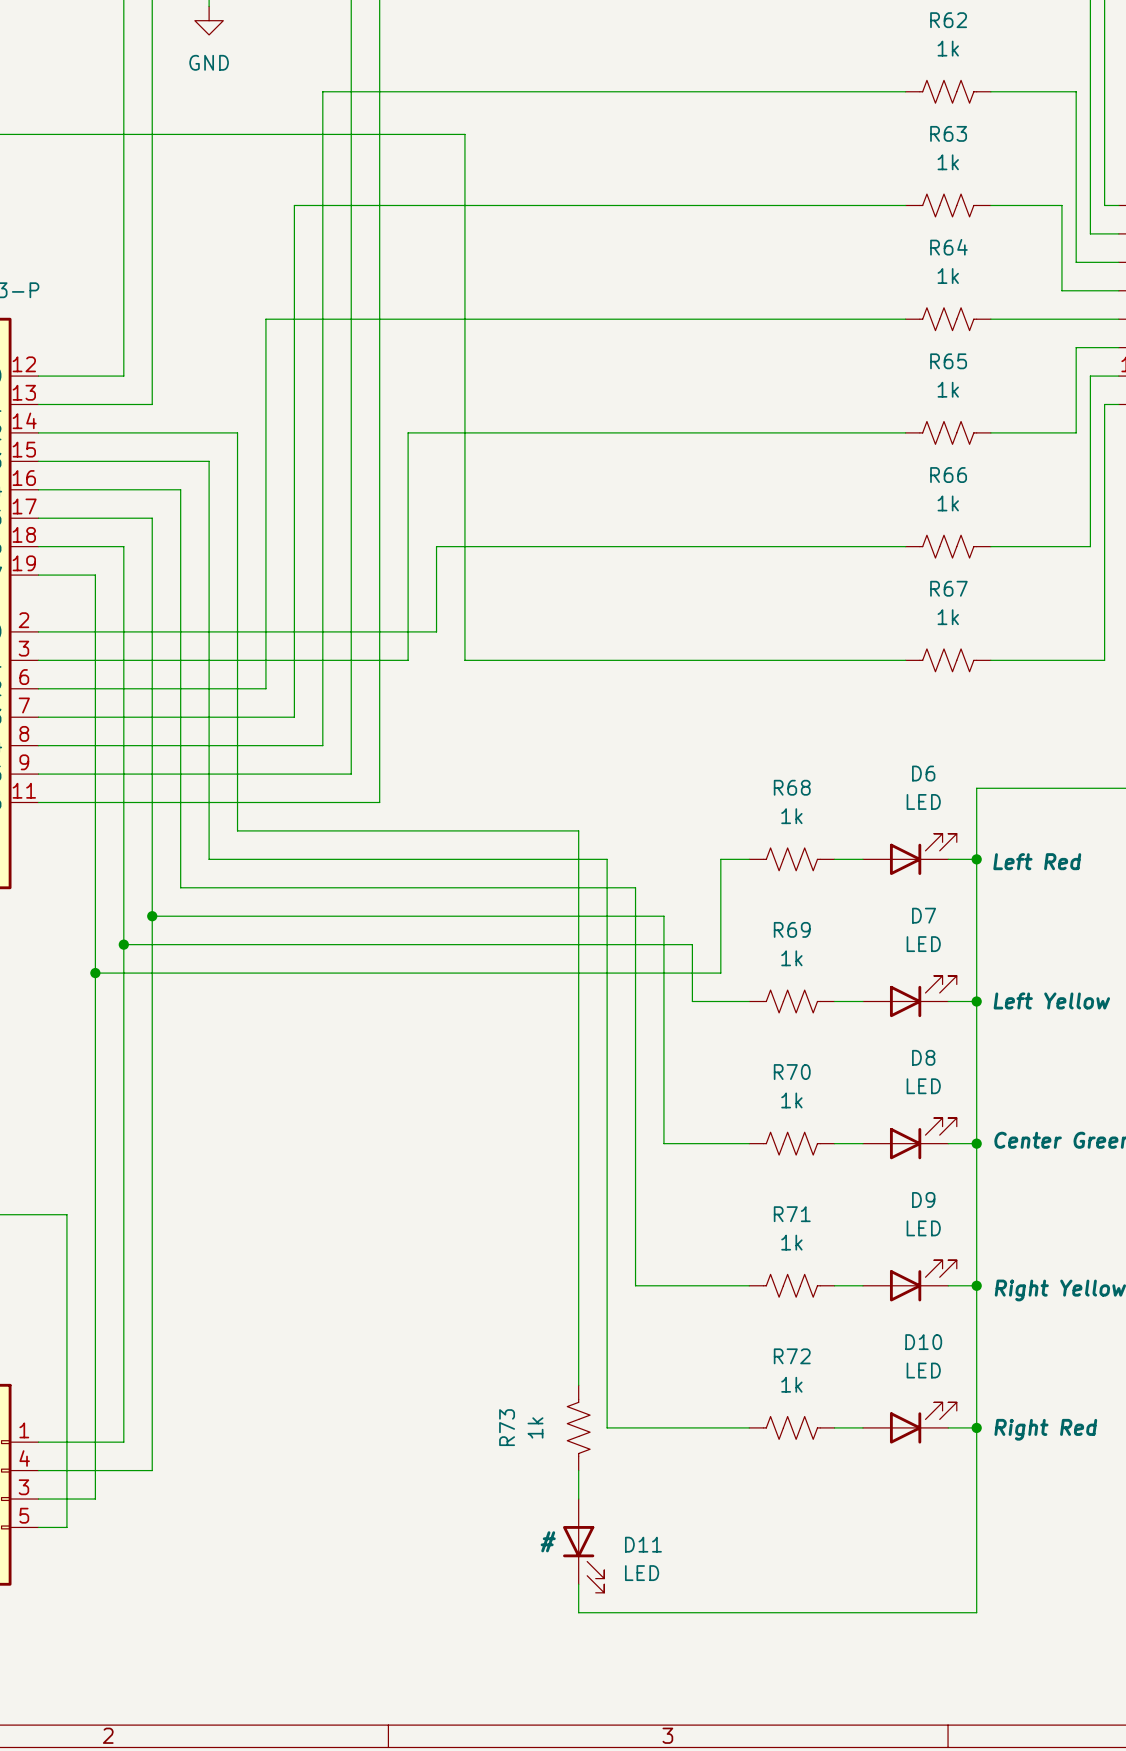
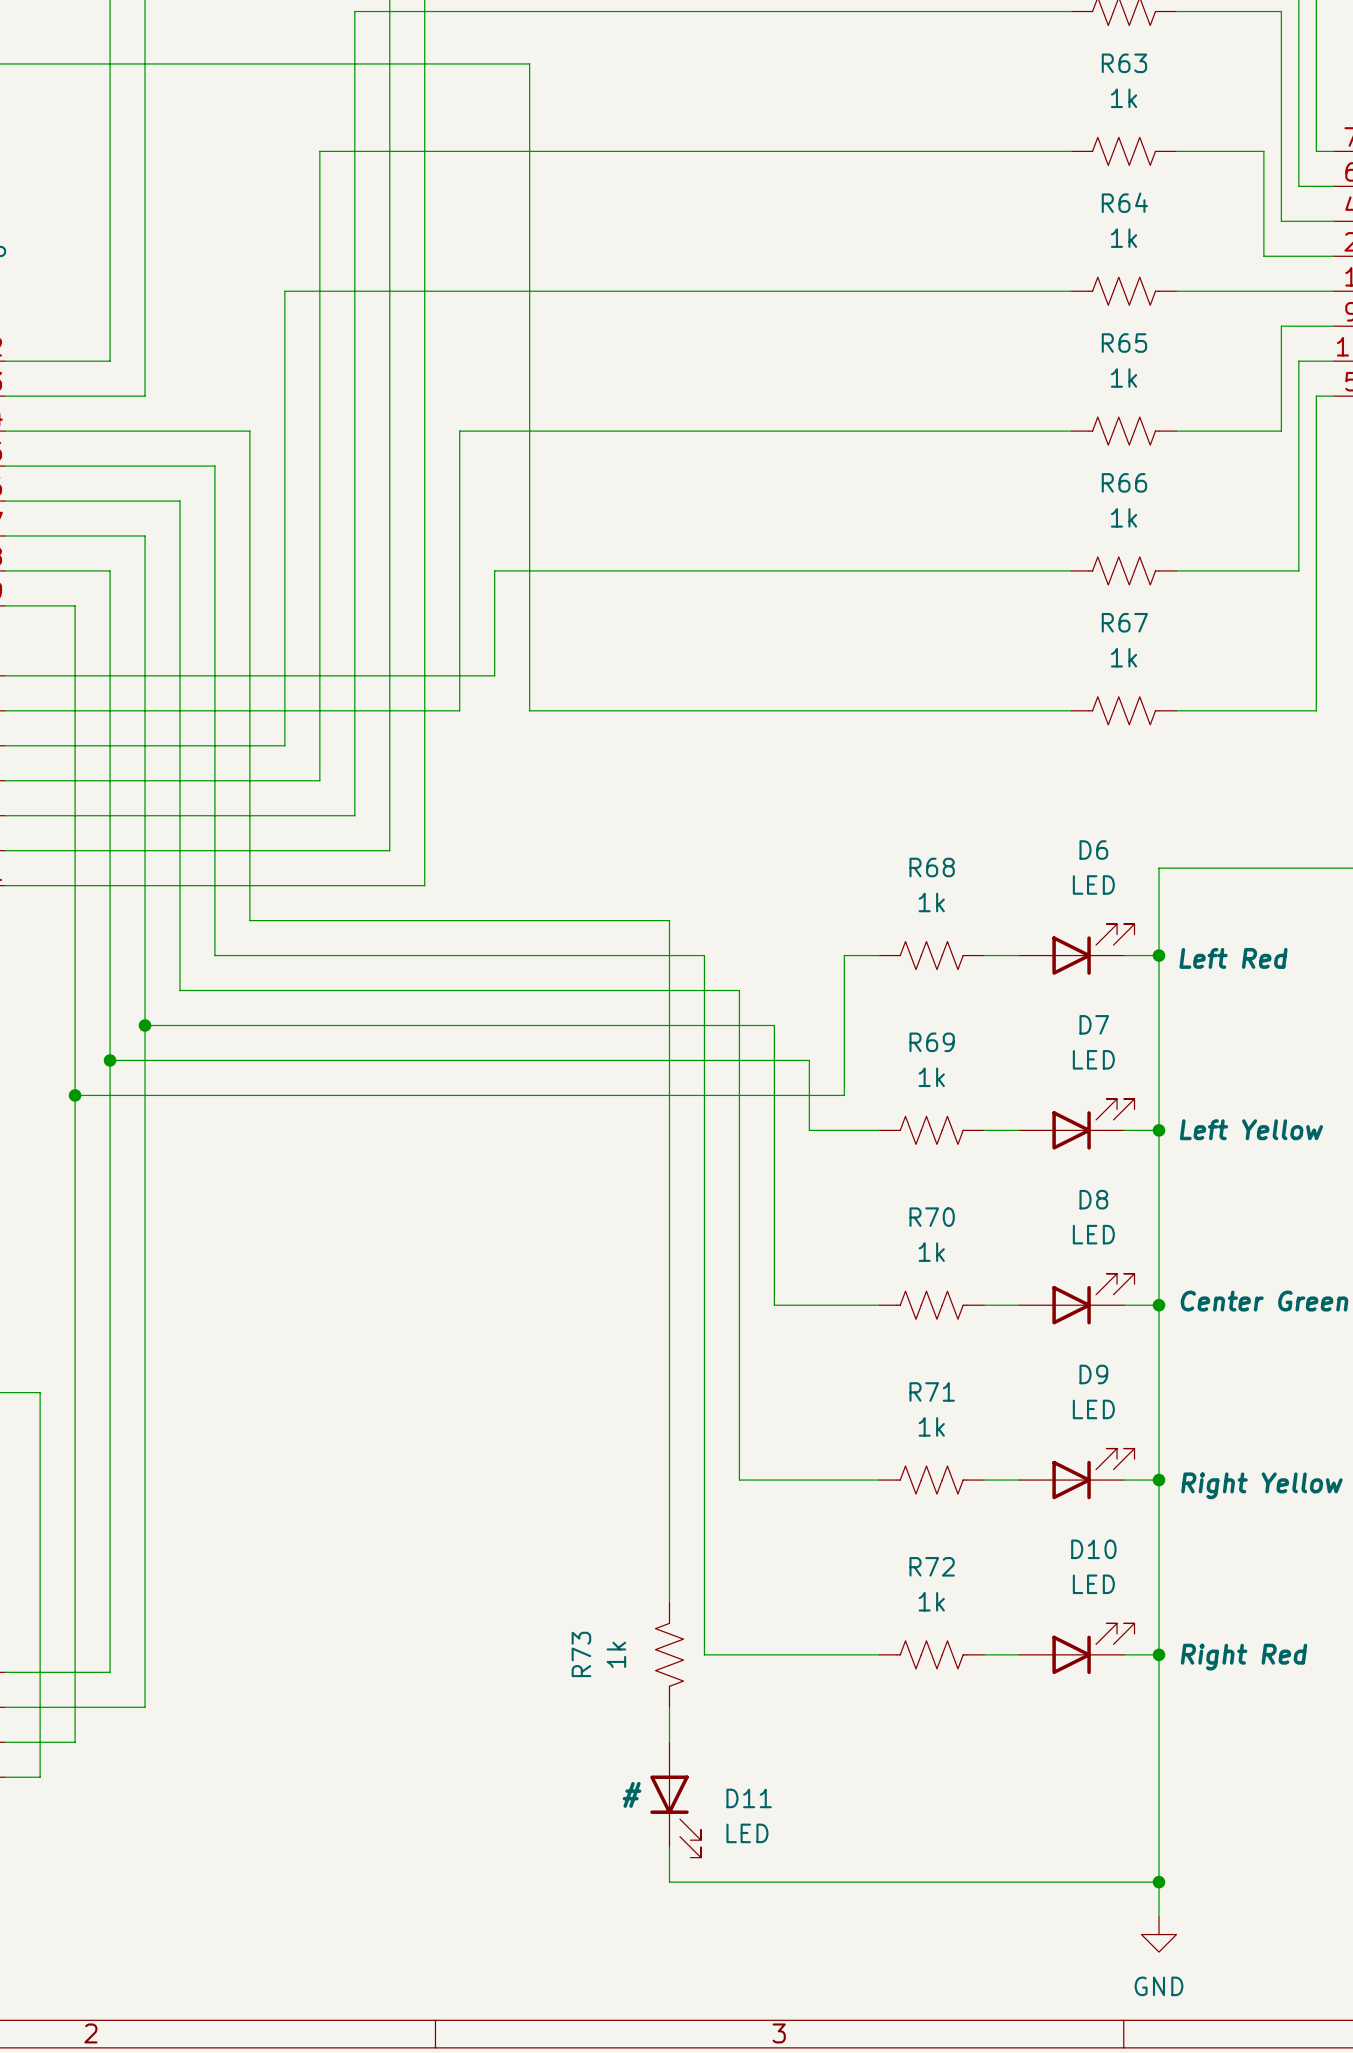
wire: none -> (1158, 1882) (1158, 1917)
junction: none -> (1158, 1882)
power symbol: none -> GND (1158, 1934)

